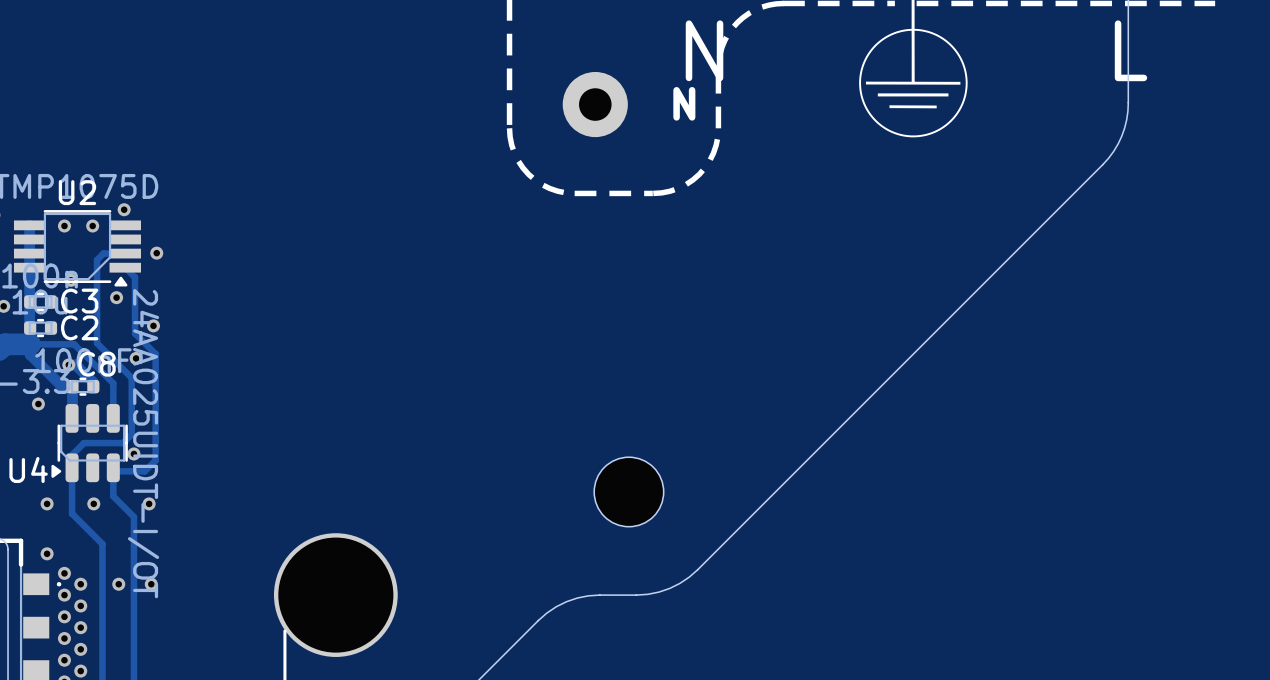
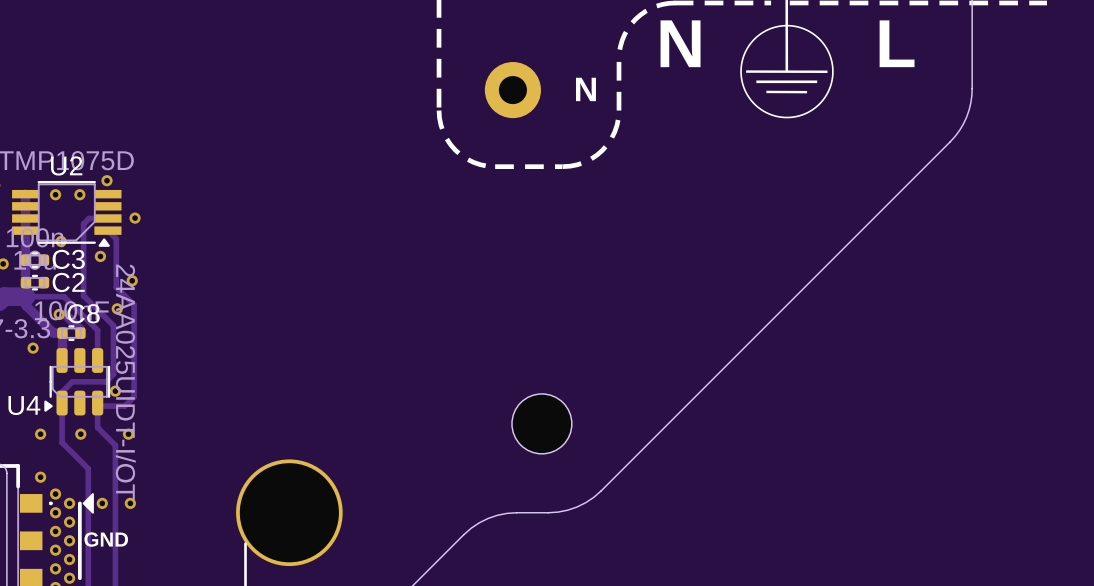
drawing: none -> [82, 493, 94, 514]
line: none -> (79, 503) (79, 578)
text: none -> GND (106, 539)

